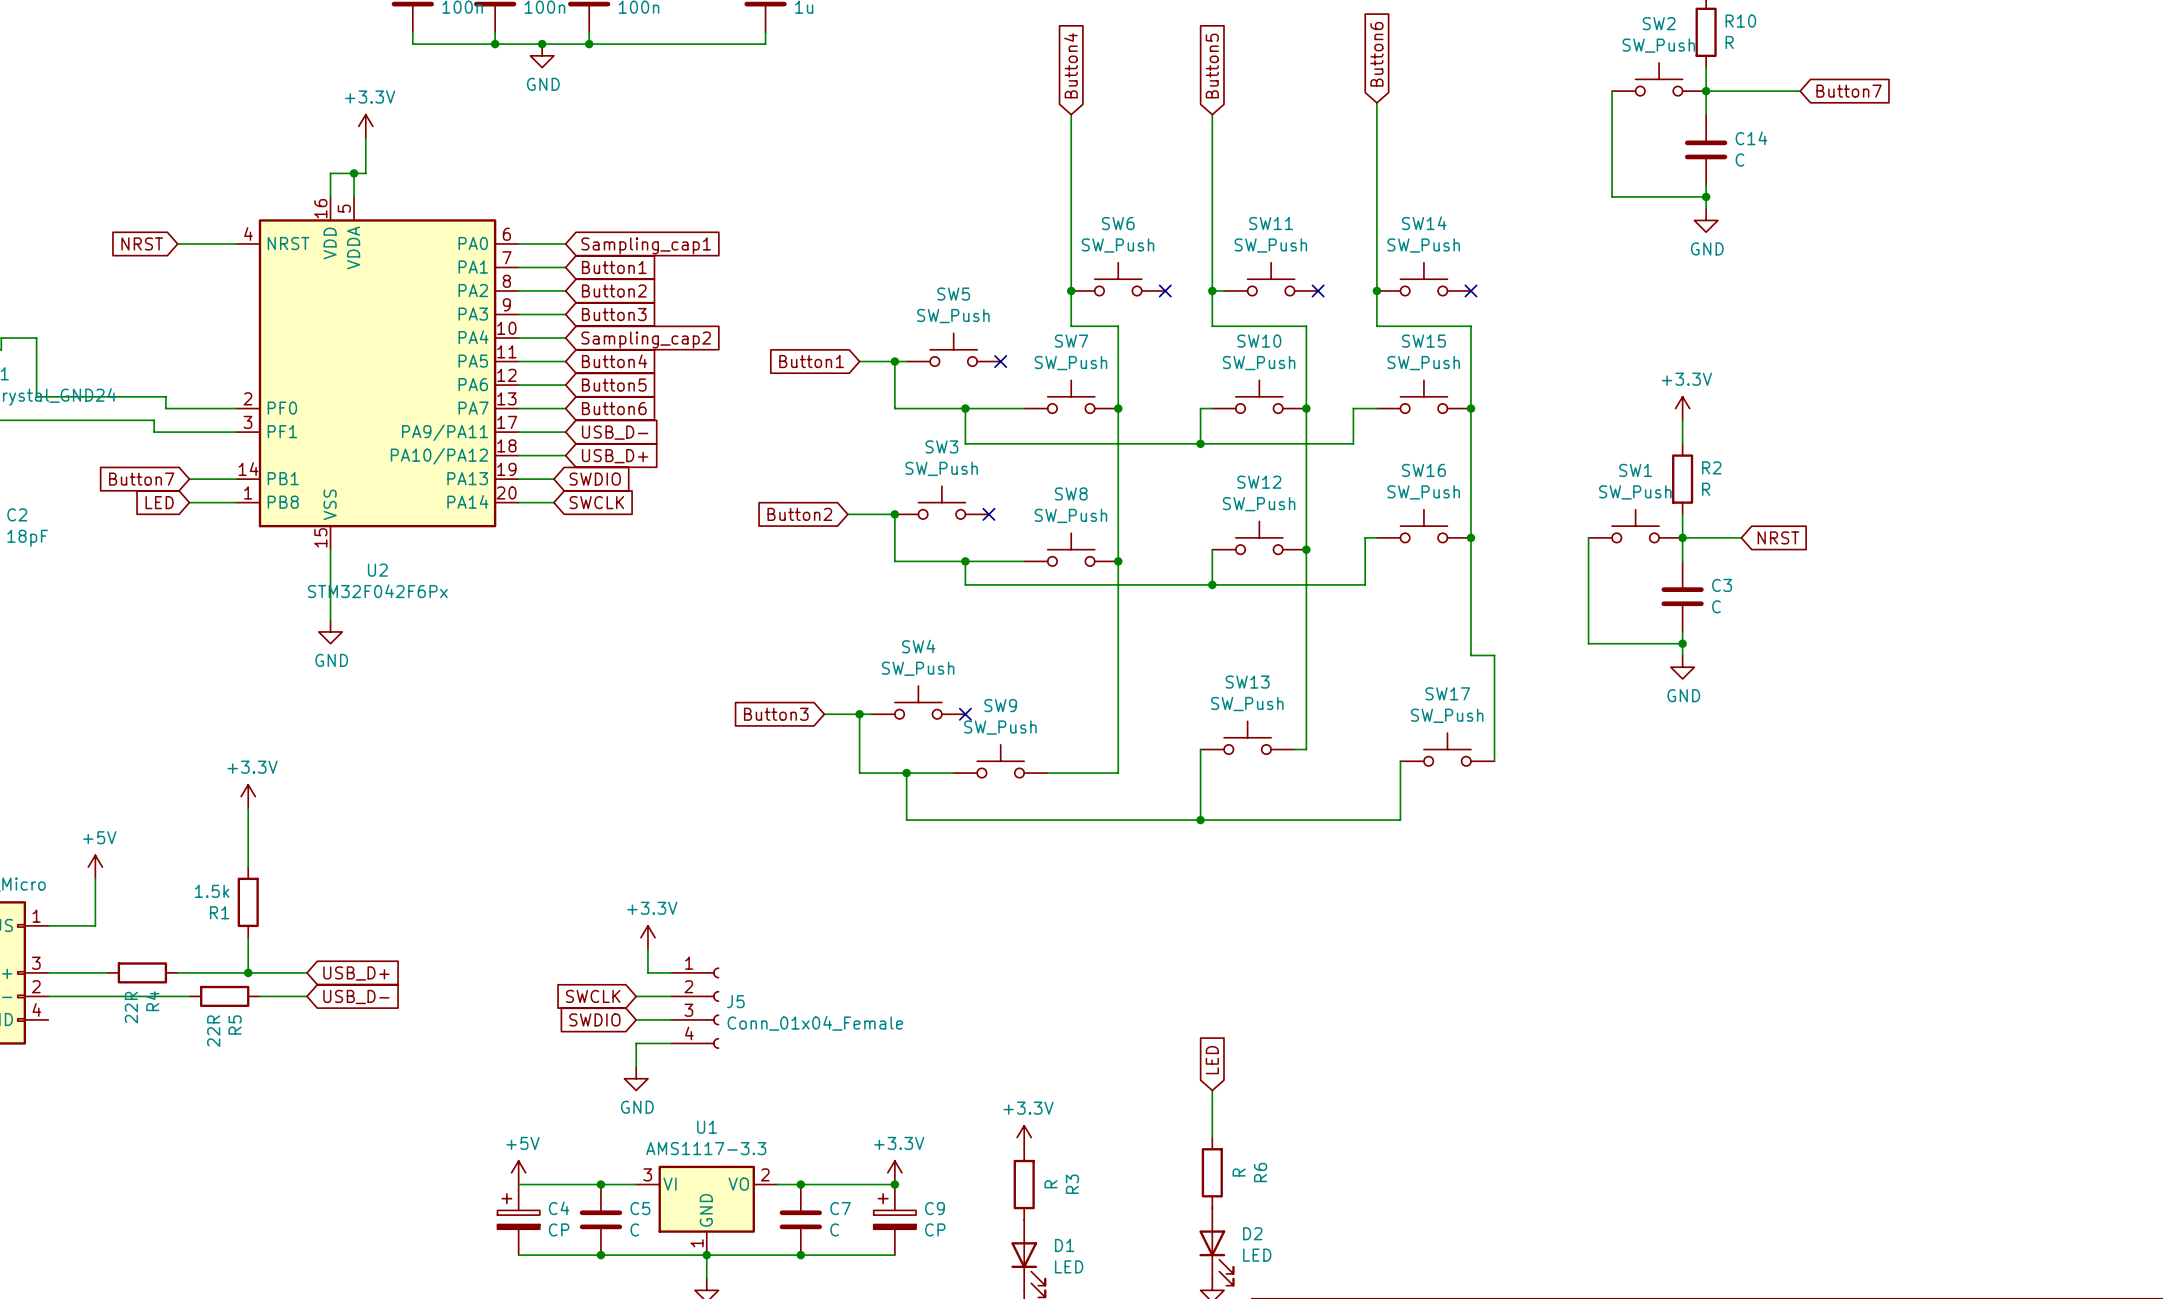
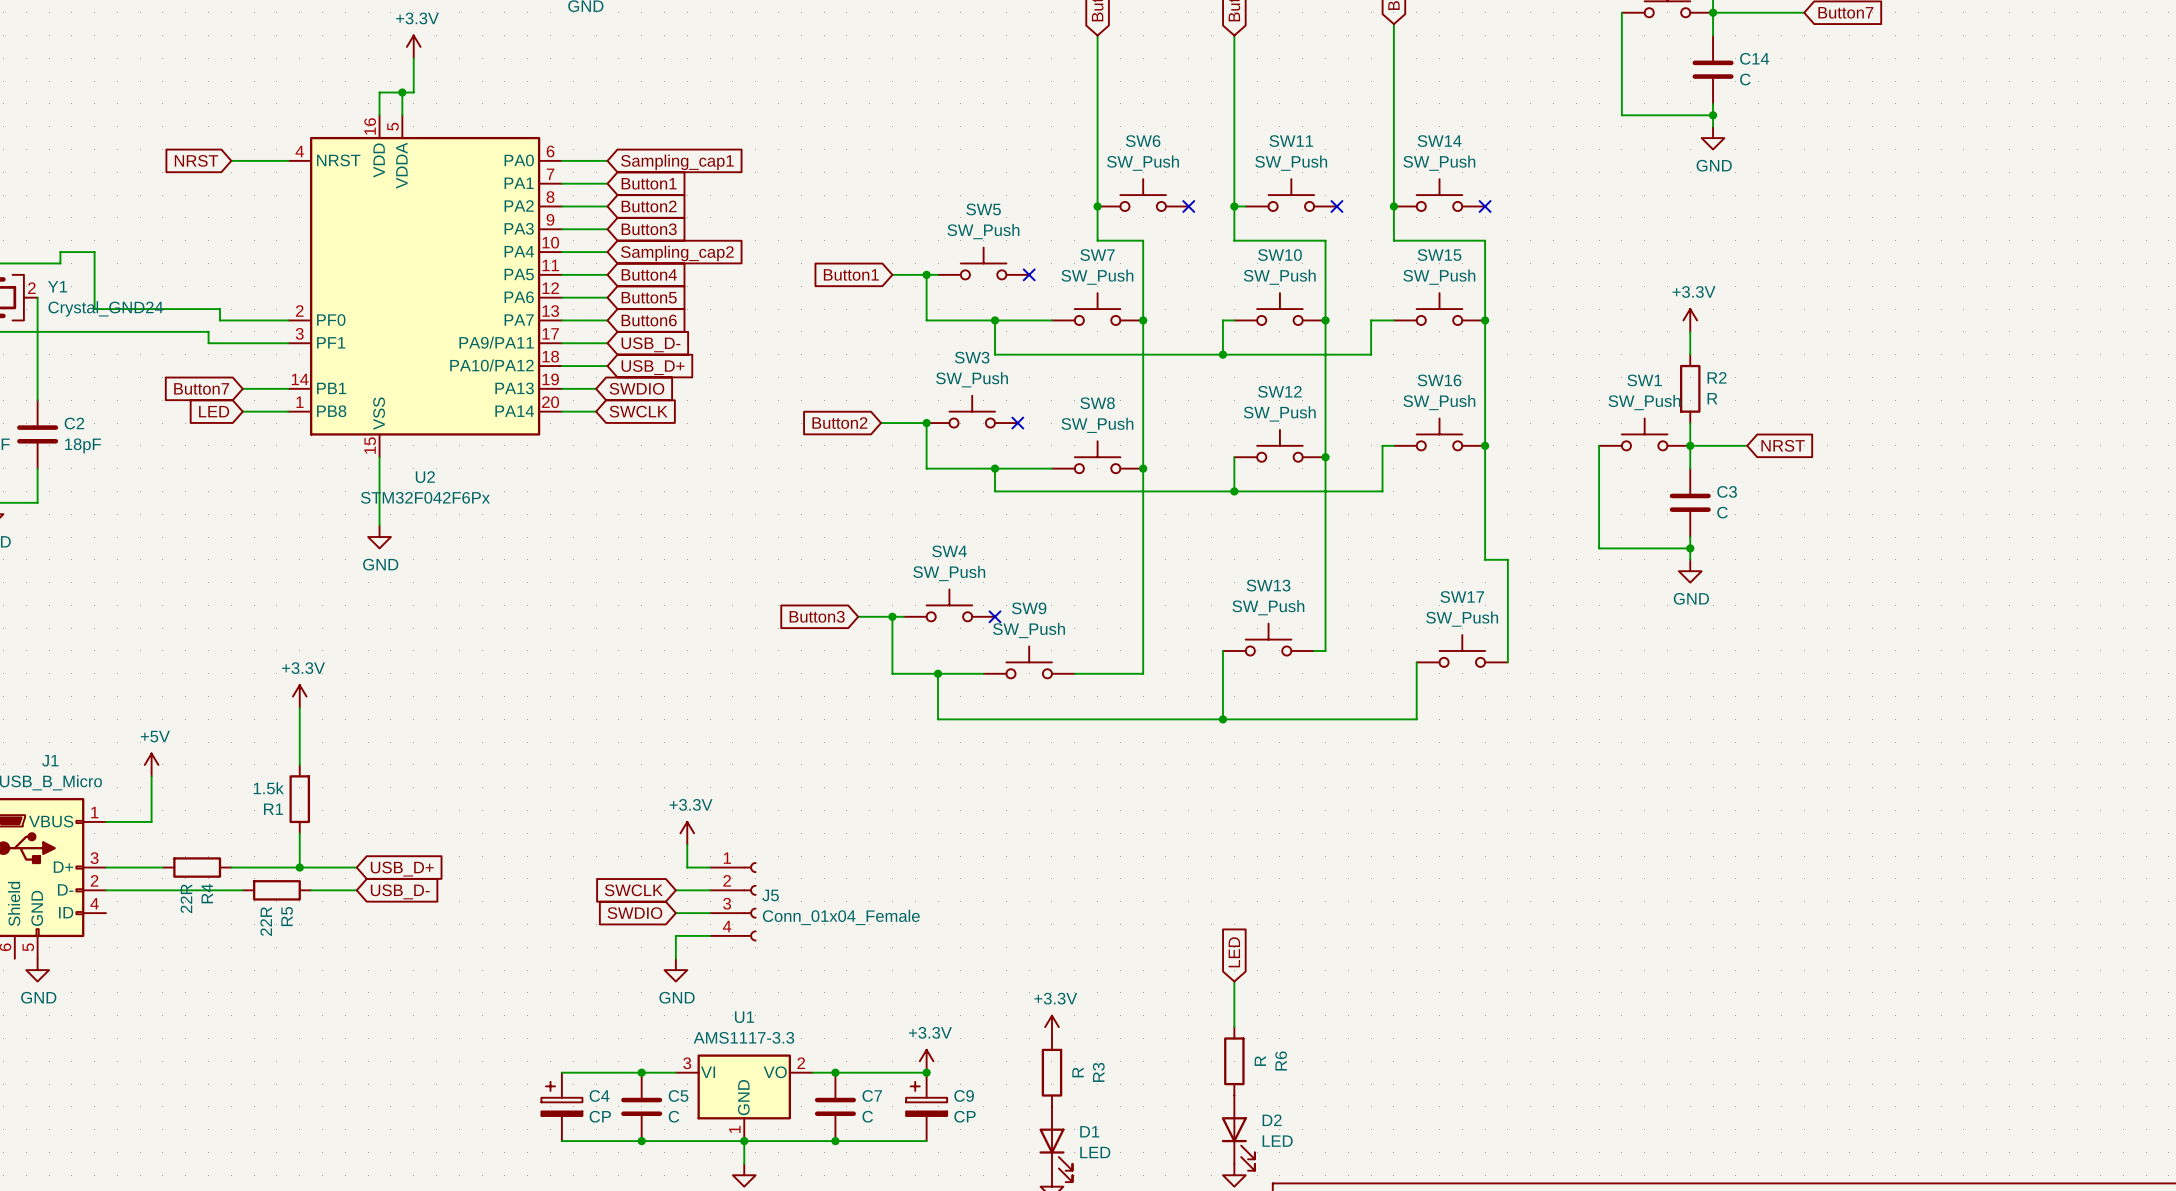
power symbol: +5V (518, 1172) -> none

